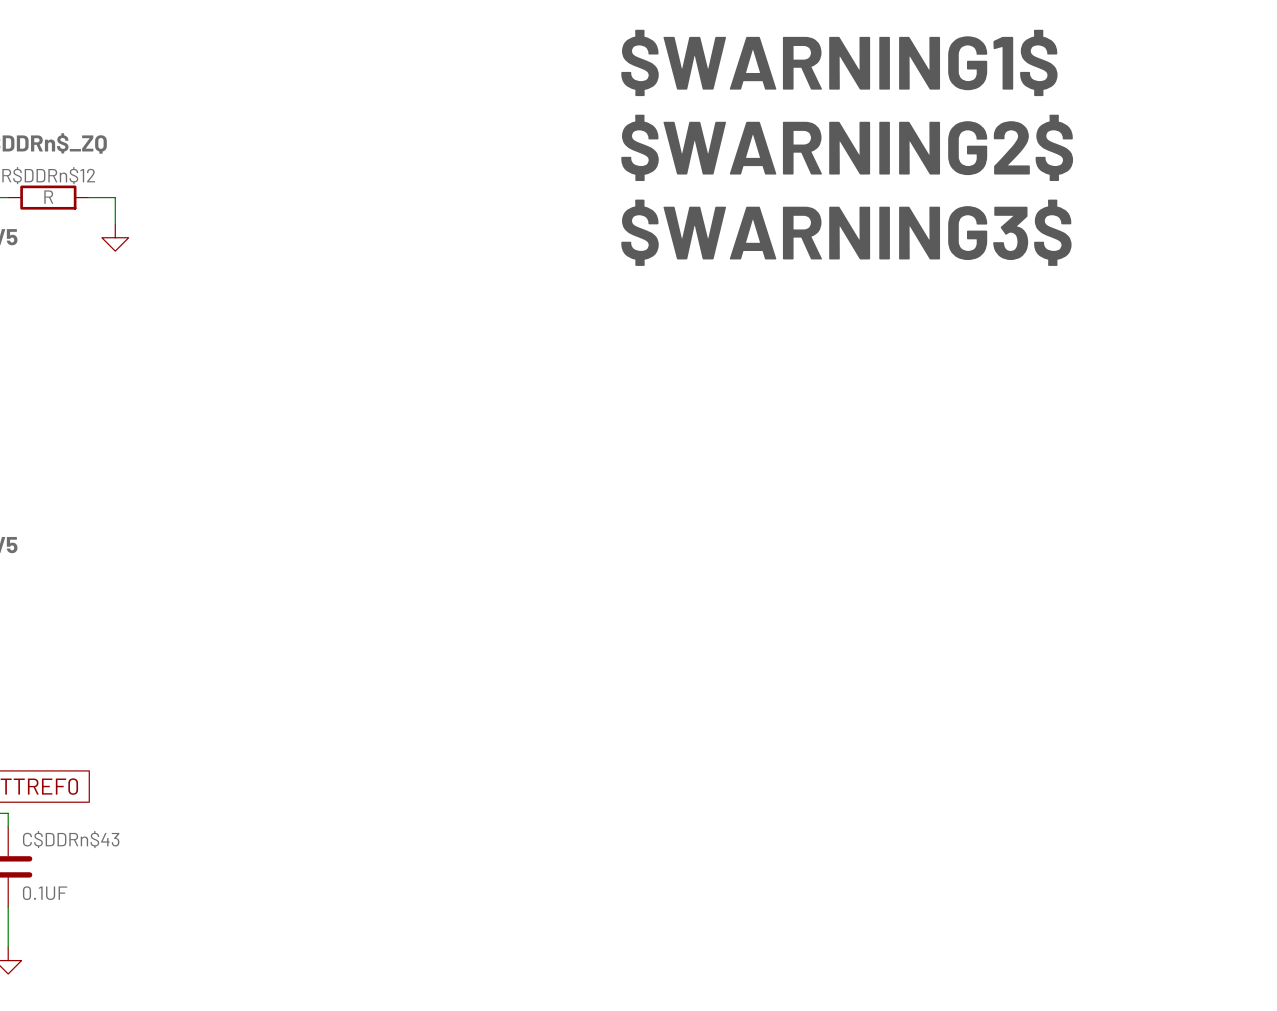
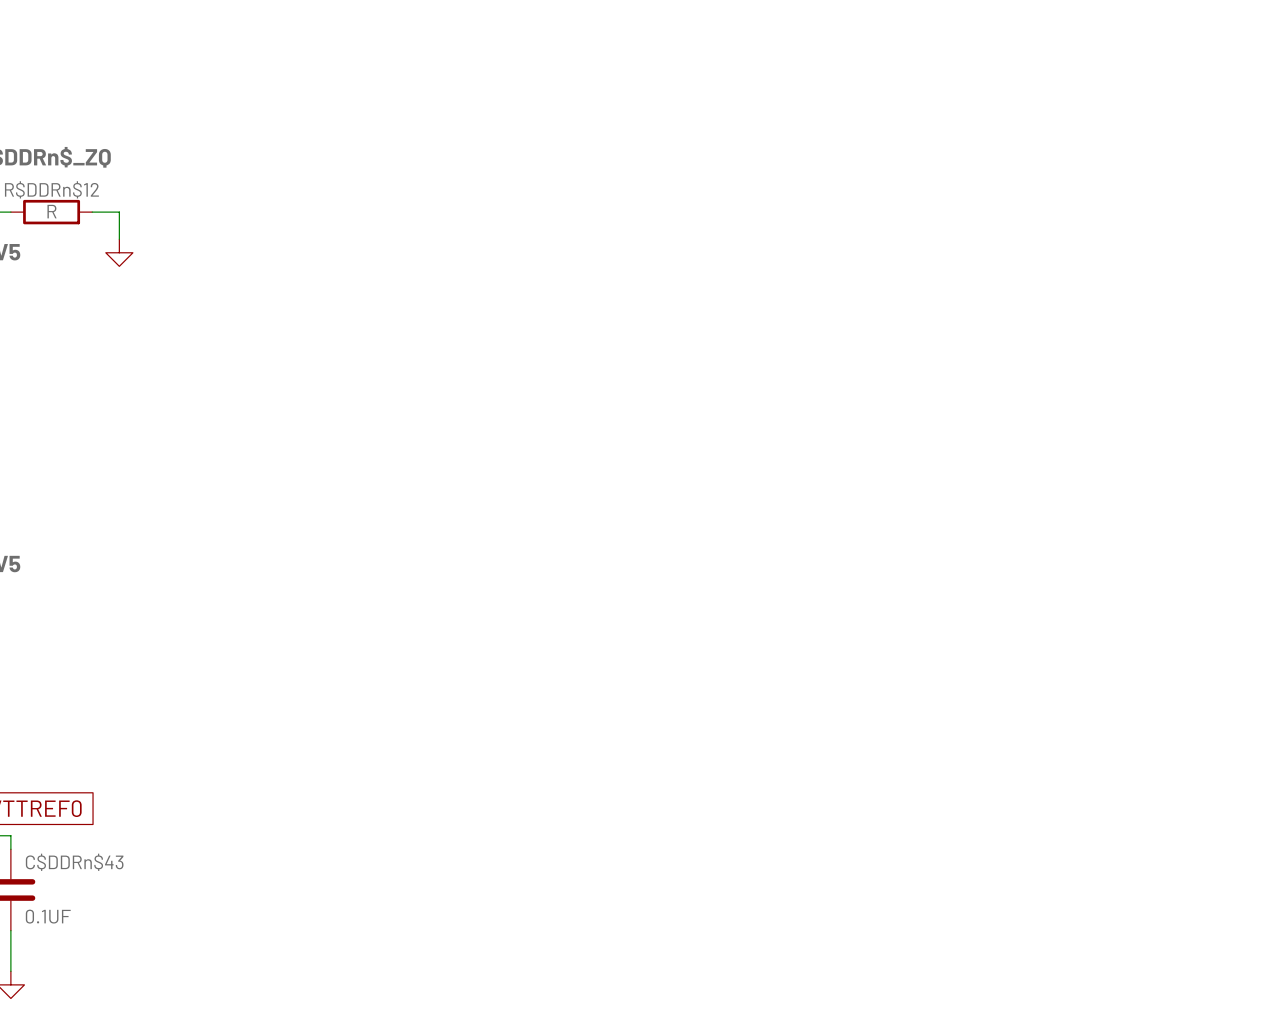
text: $WARNING1$ (839, 62) -> none
text: $WARNING2$ (847, 147) -> none
text: $WARNING3$ (846, 232) -> none

